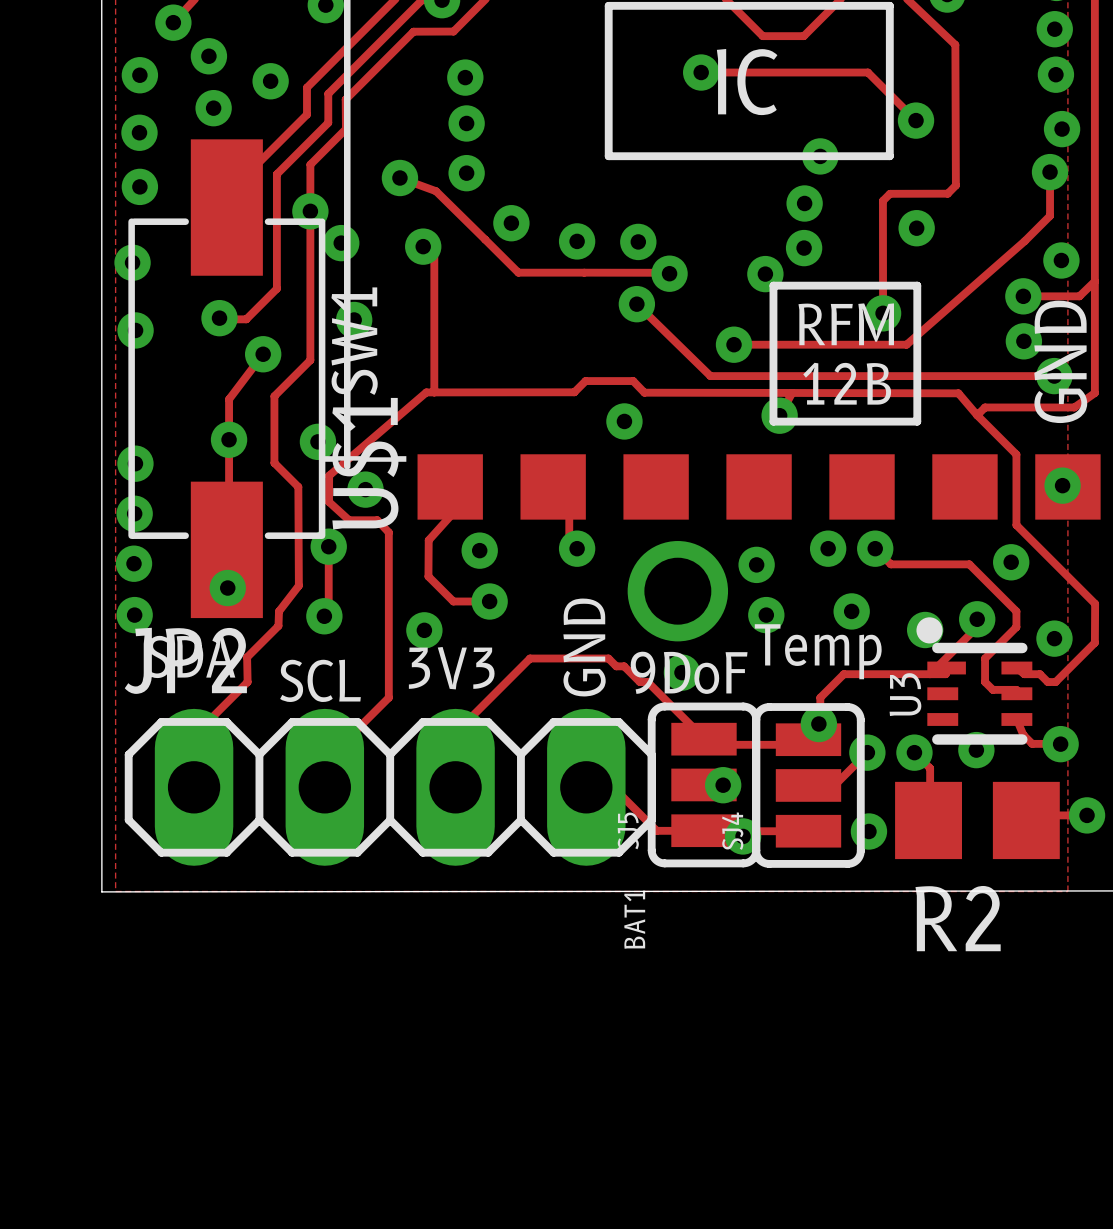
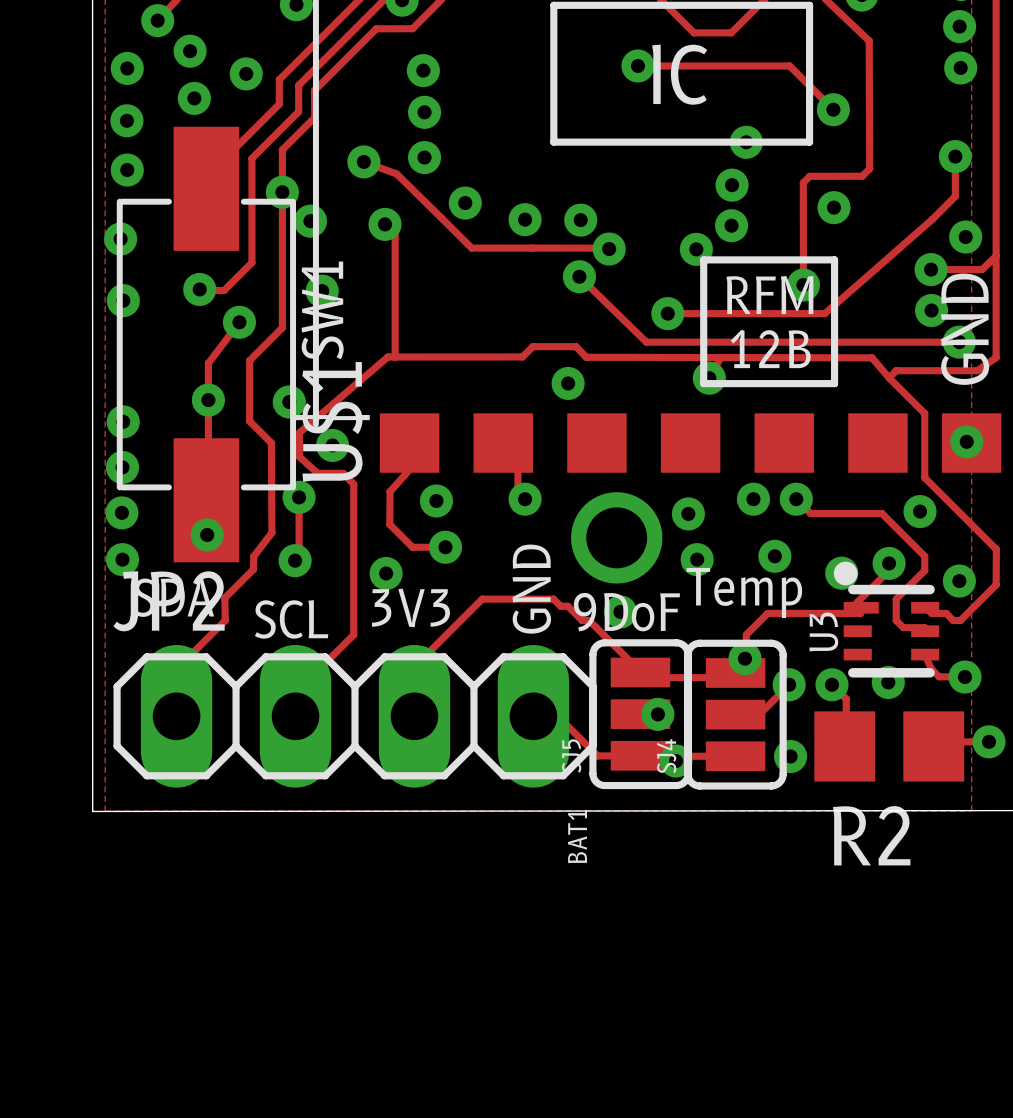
via: (1062, 129) -> none

